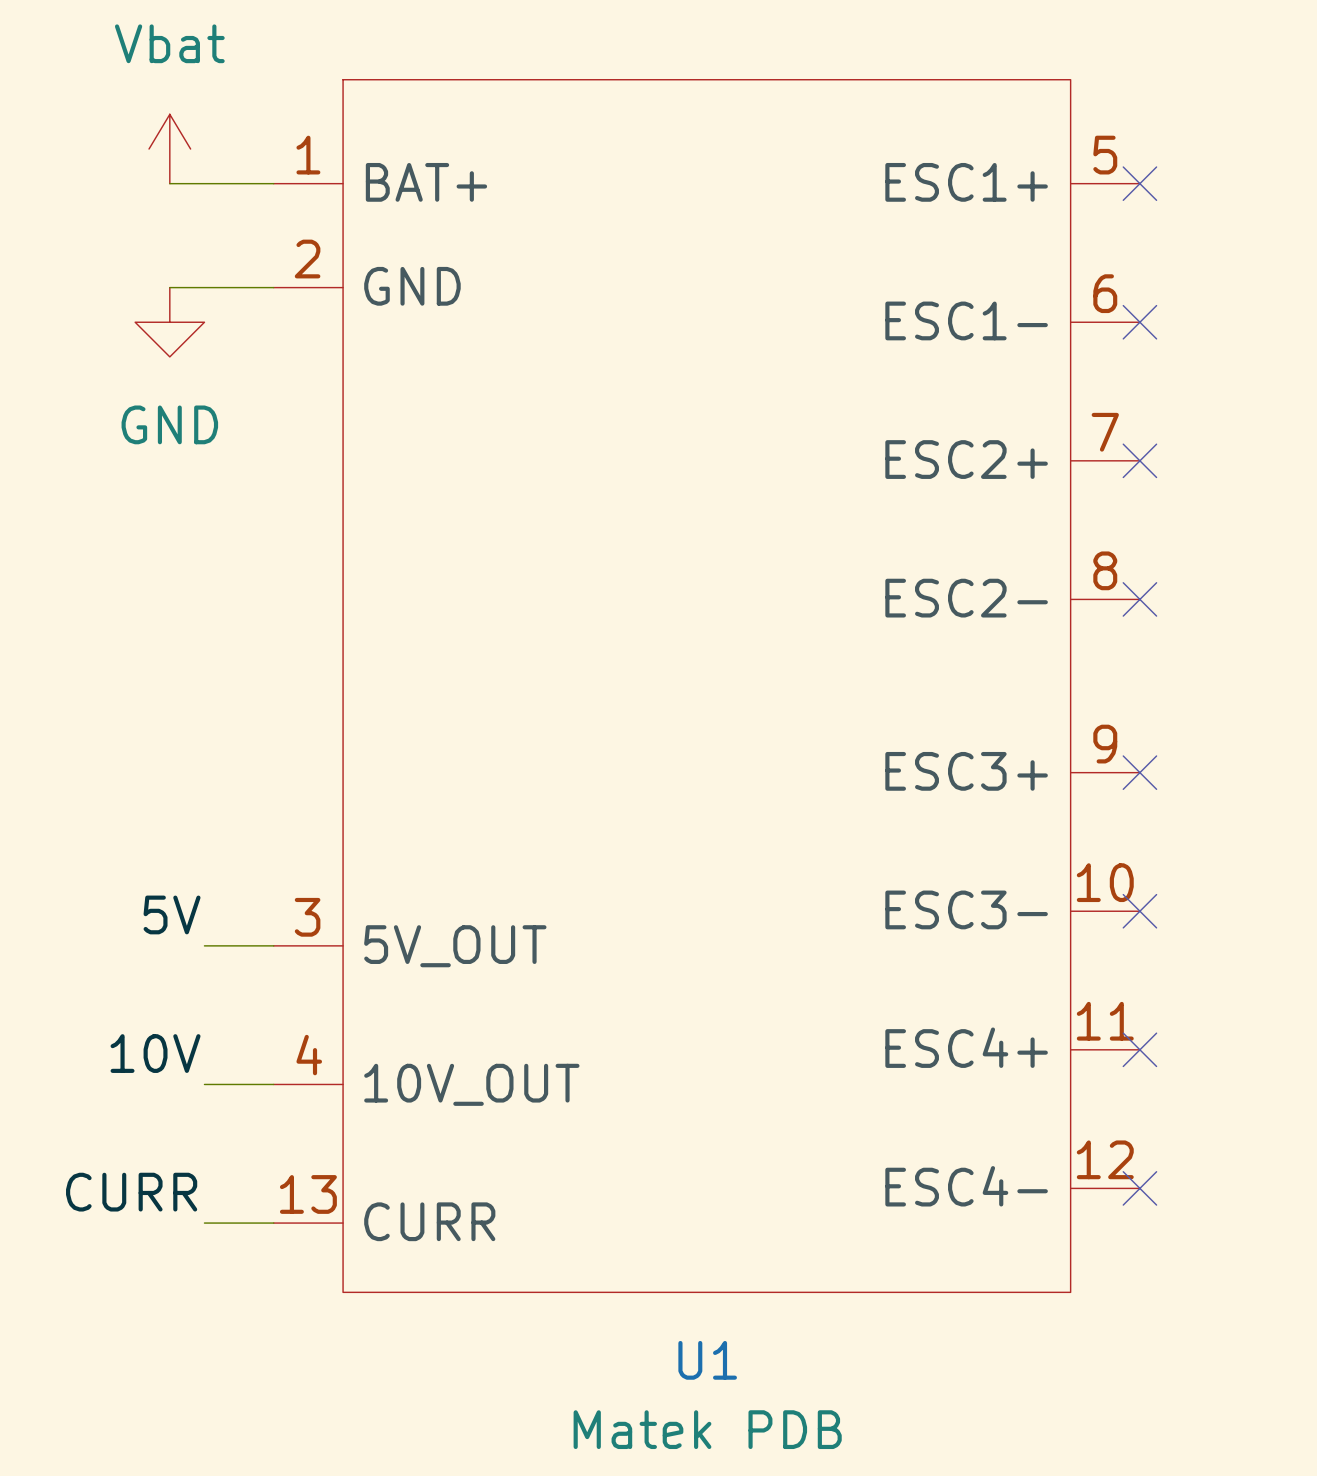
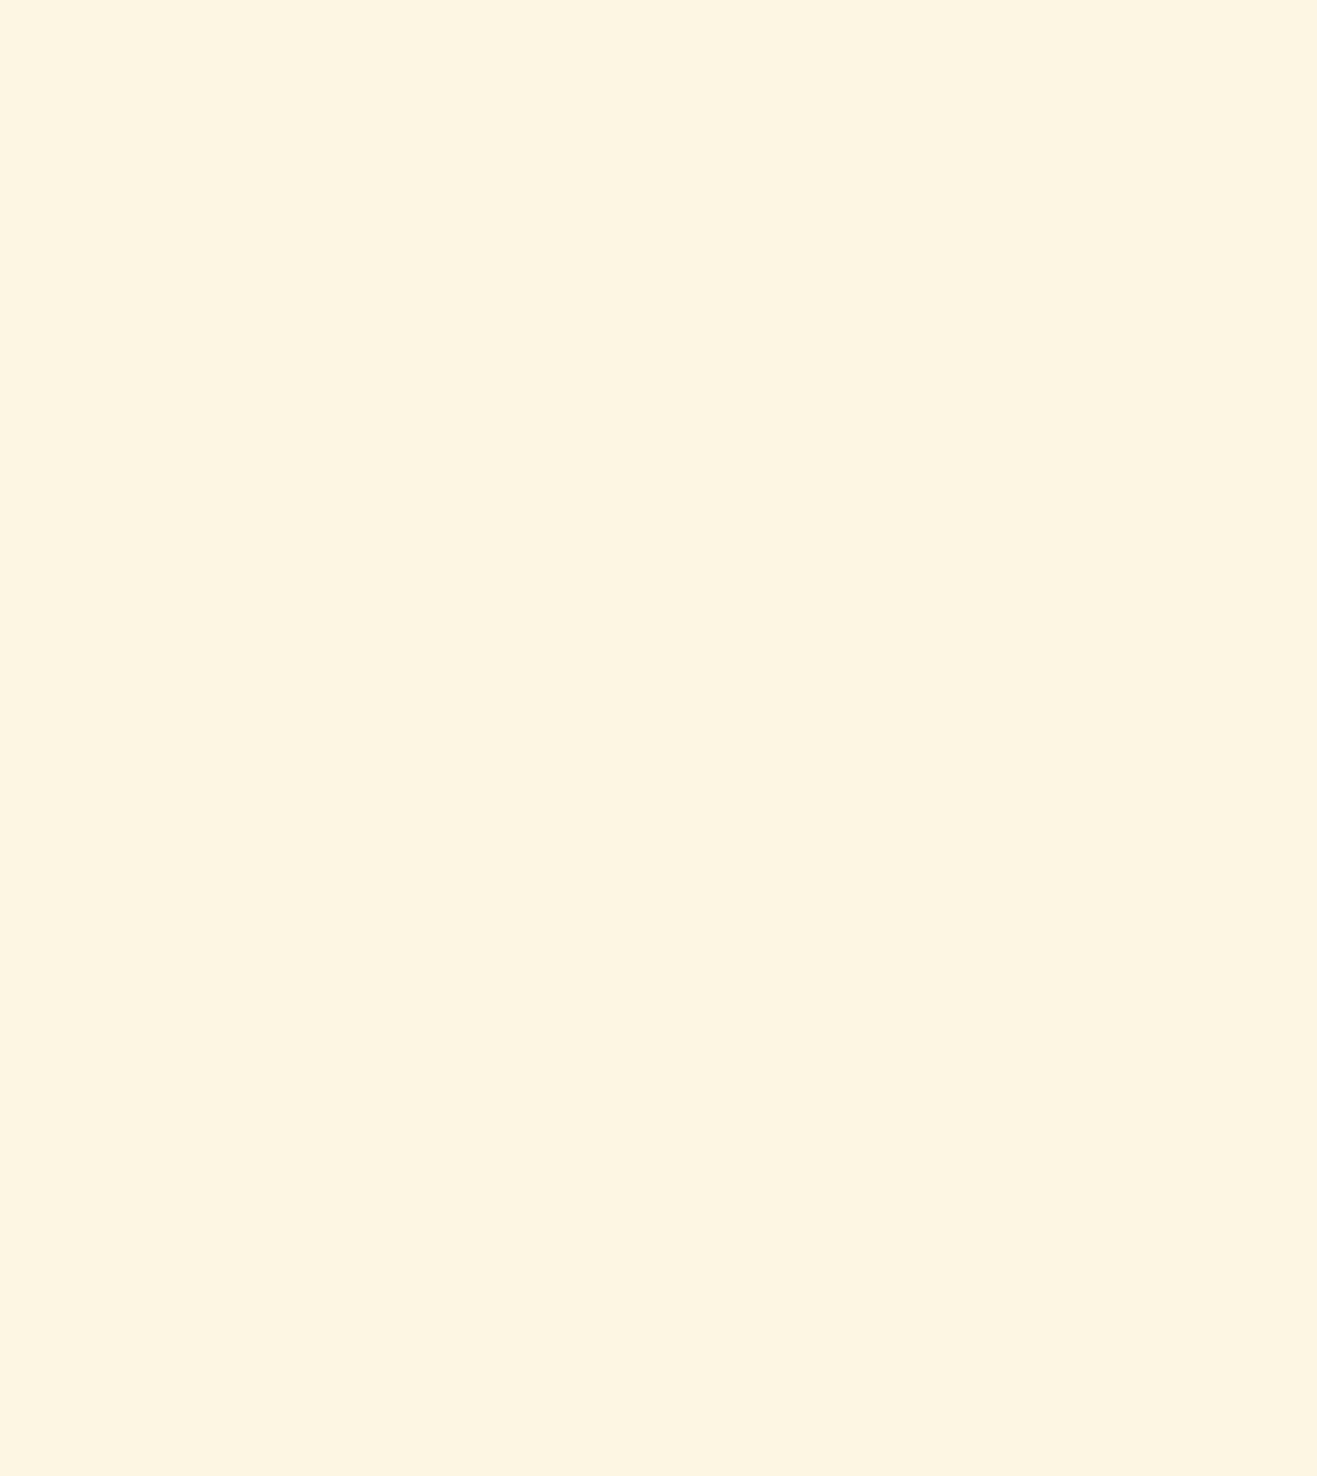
power symbol: Vbat (169, 149) -> none
wire: (169, 183) (273, 183) -> none
no-connect mark: (1139, 183) -> none
wire: (169, 287) (273, 287) -> none
power symbol: GND (169, 322) -> none
no-connect mark: (1139, 322) -> none
no-connect mark: (1139, 460) -> none
no-connect mark: (1139, 599) -> none
U1: Matek PDB (706, 686) -> none
no-connect mark: (1139, 772) -> none
no-connect mark: (1139, 911) -> none
label: 5V (172, 914) -> none
wire: (204, 945) (273, 945) -> none
no-connect mark: (1139, 1049) -> none
label: 10V (155, 1053) -> none
wire: (204, 1084) (273, 1084) -> none
no-connect mark: (1139, 1188) -> none
label: CURR (131, 1192) -> none
wire: (204, 1223) (273, 1223) -> none

